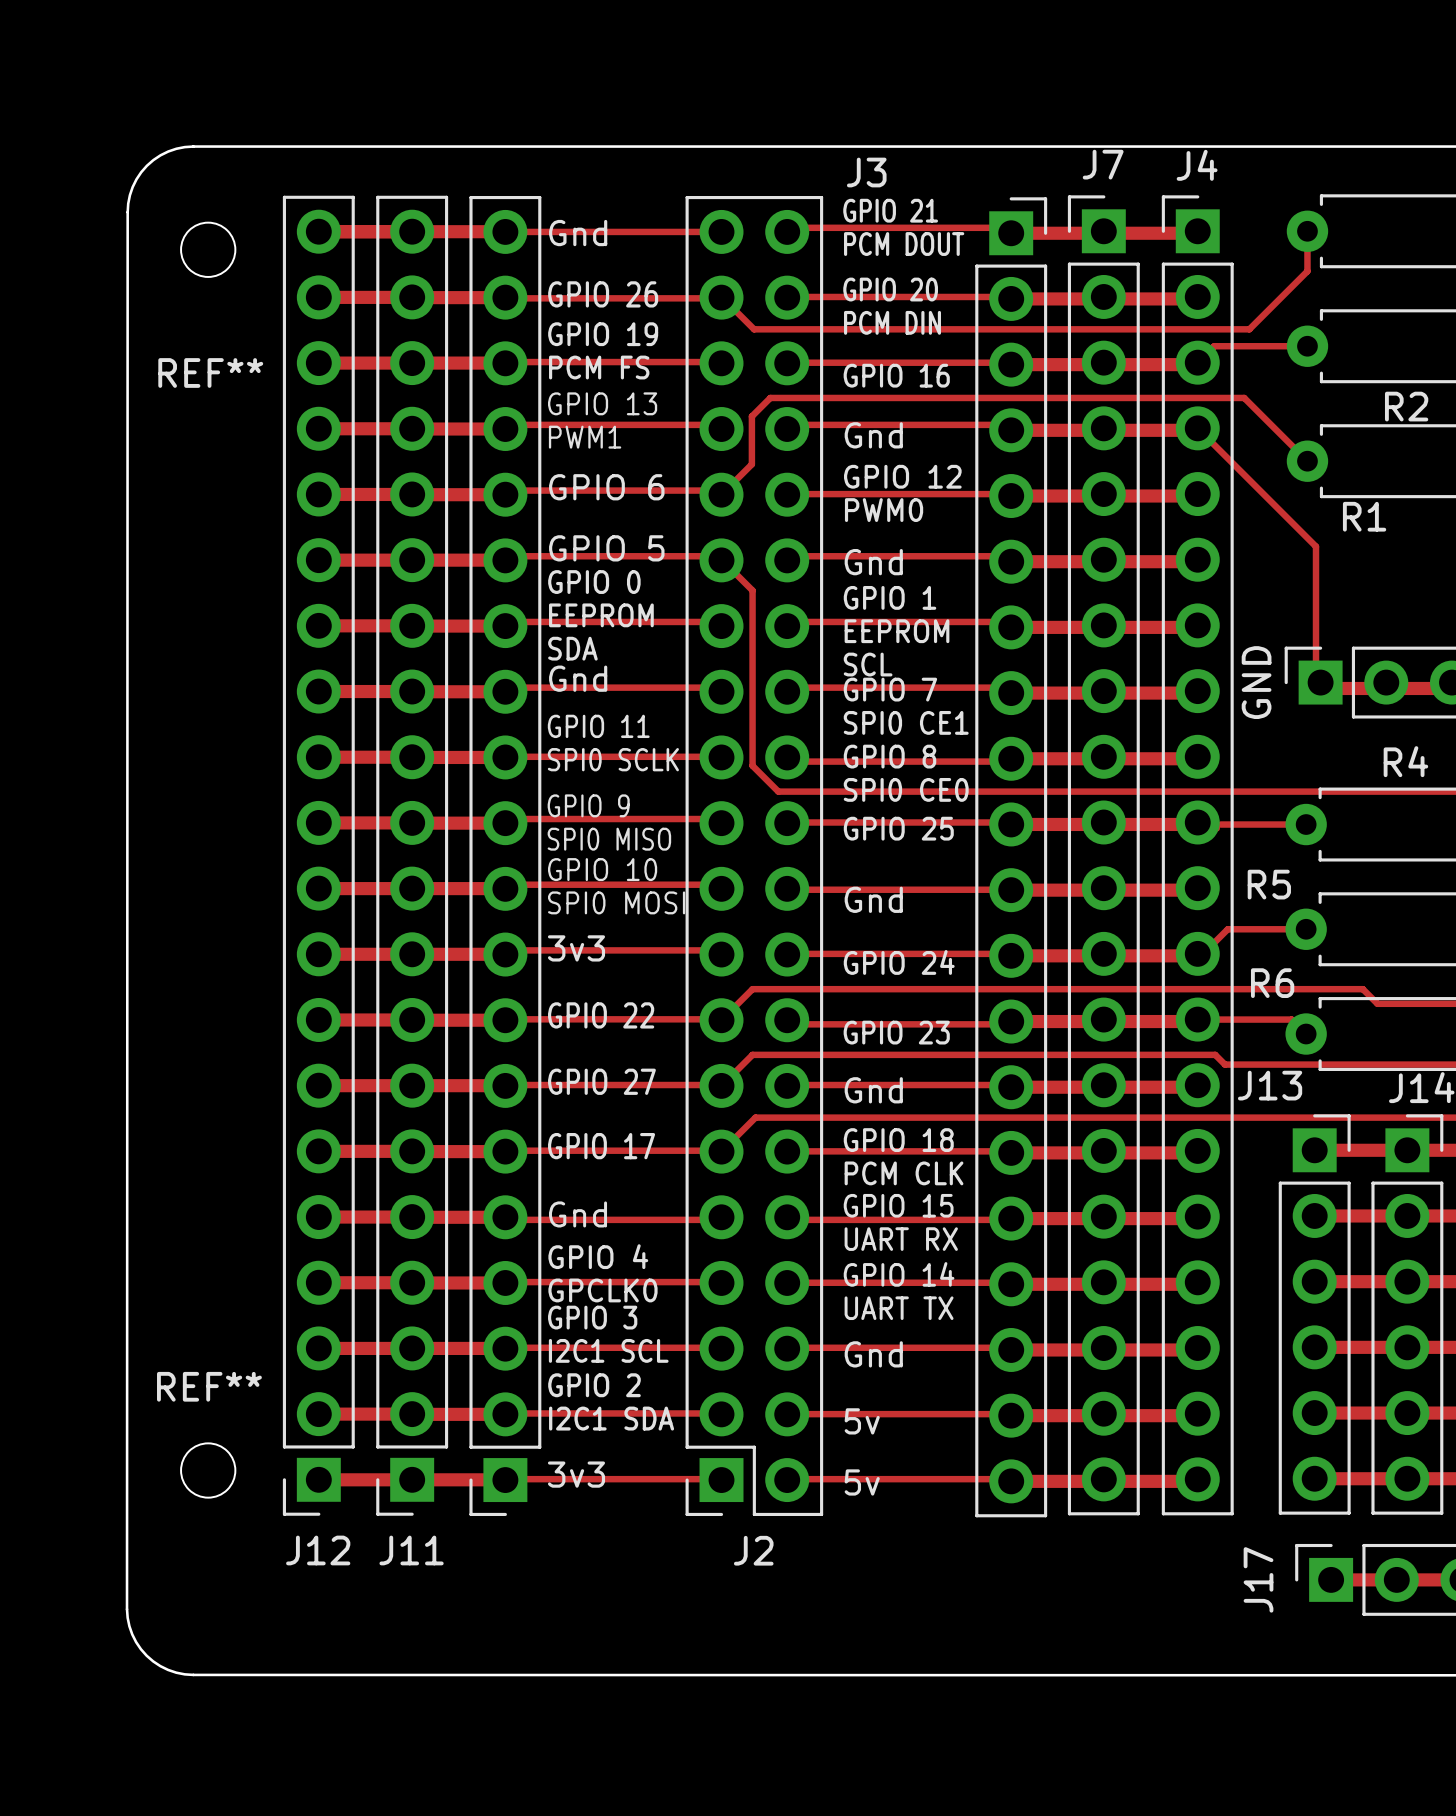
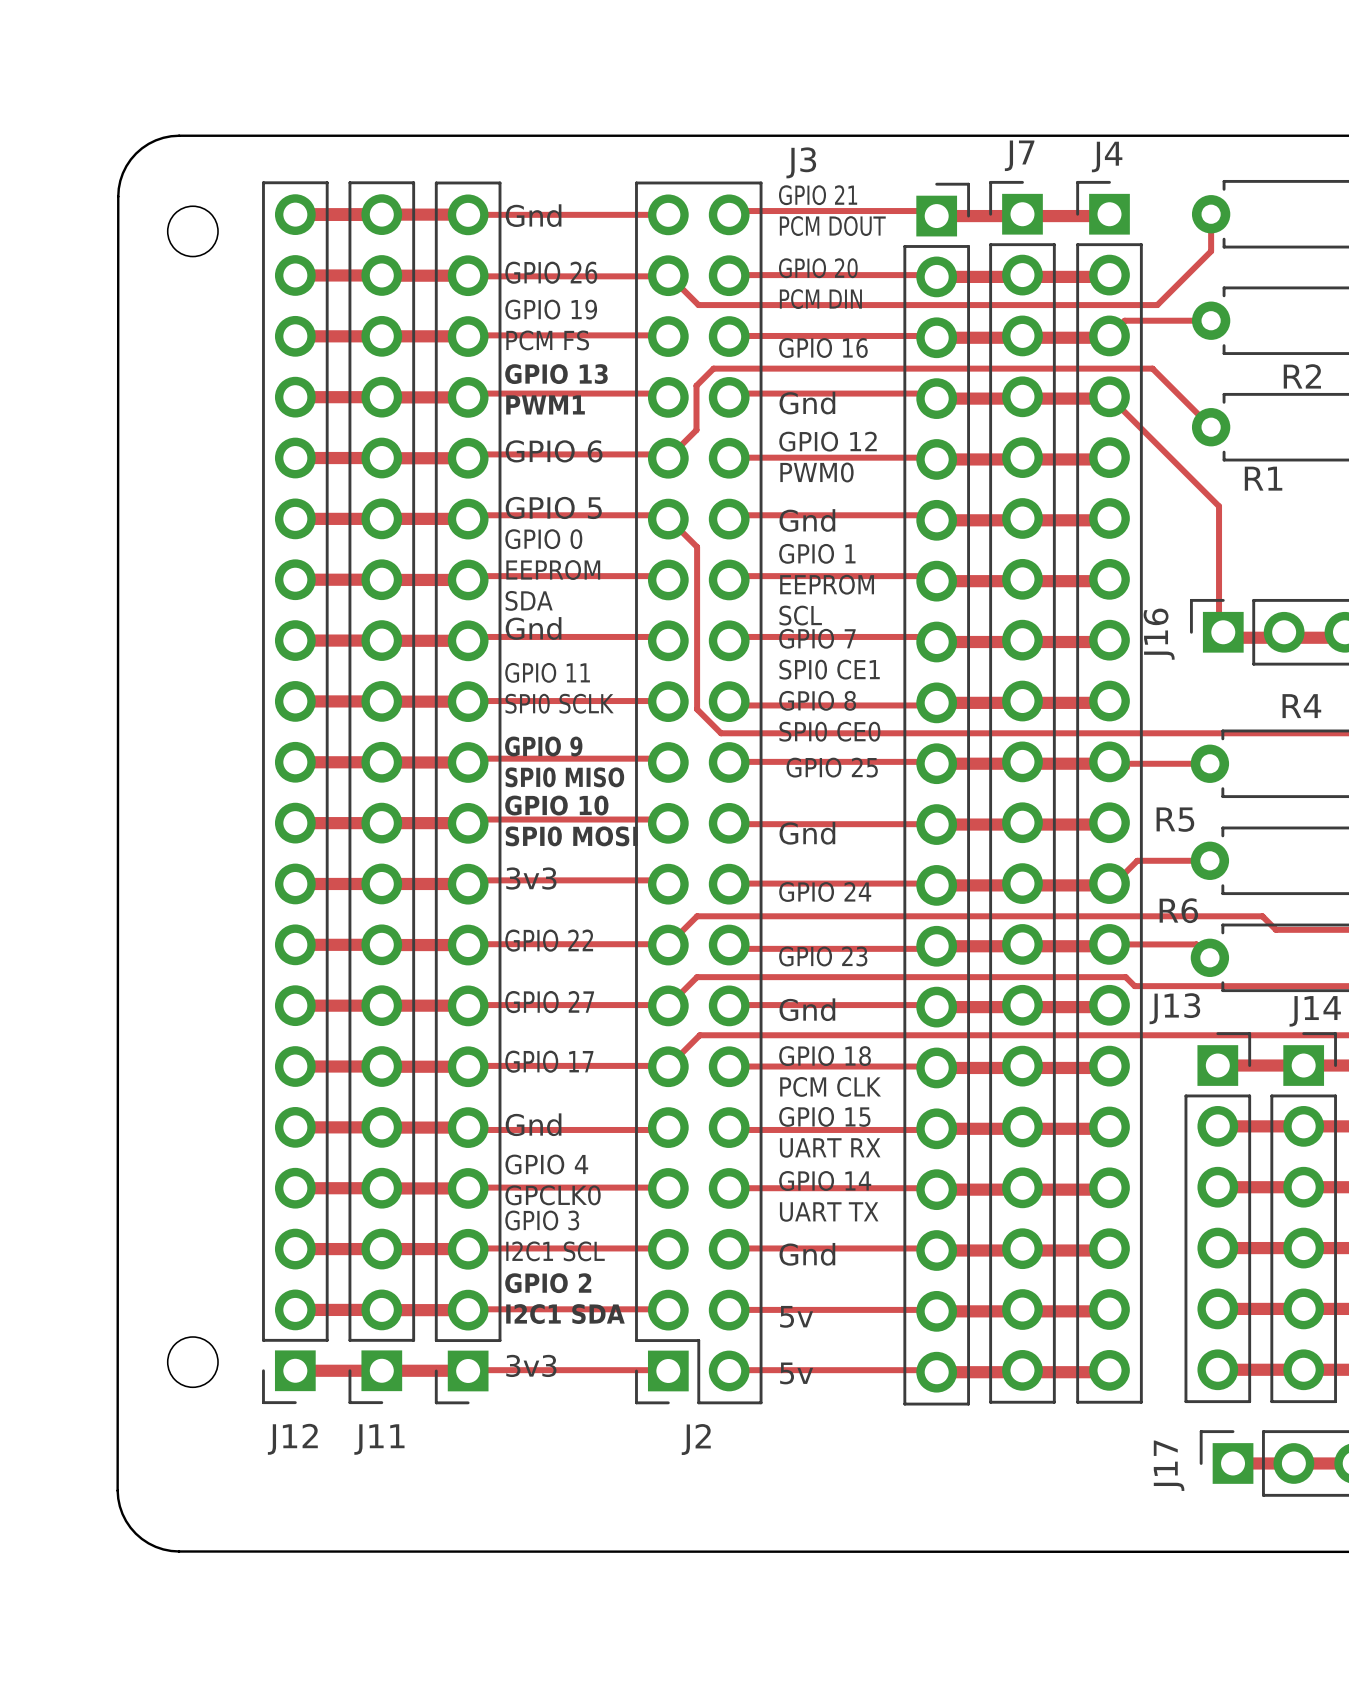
REF** name: REF** (210, 372) -> none
GND name: GND (1256, 682) -> J16 (1159, 634)
REF** name: REF** (209, 1386) -> none

